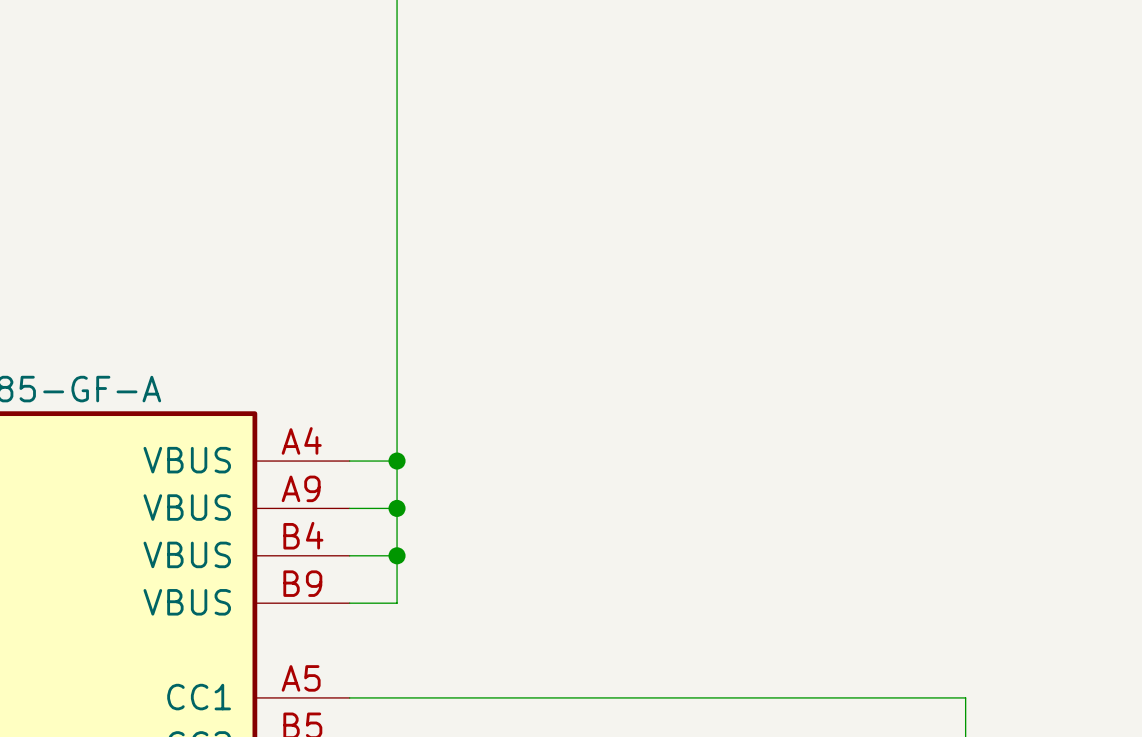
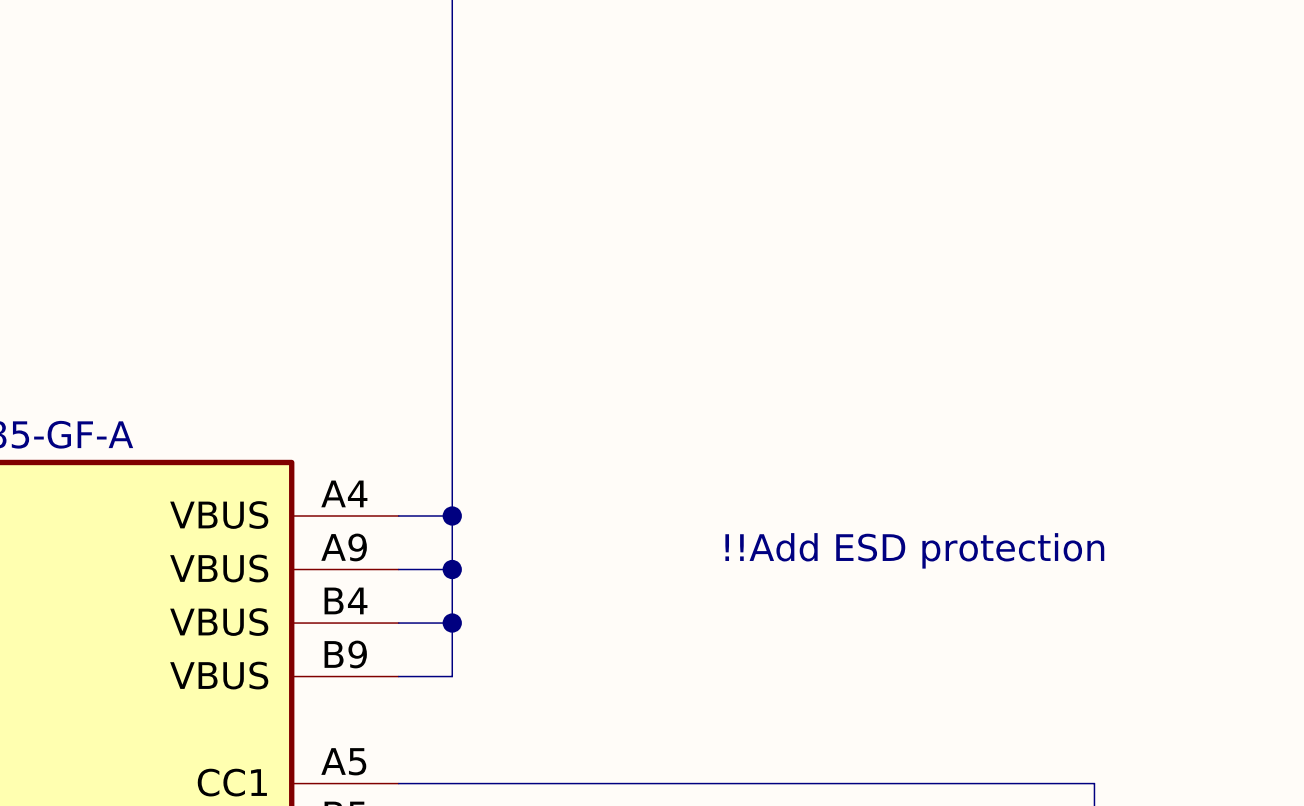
text: none -> !!Add ESD protection (914, 550)

